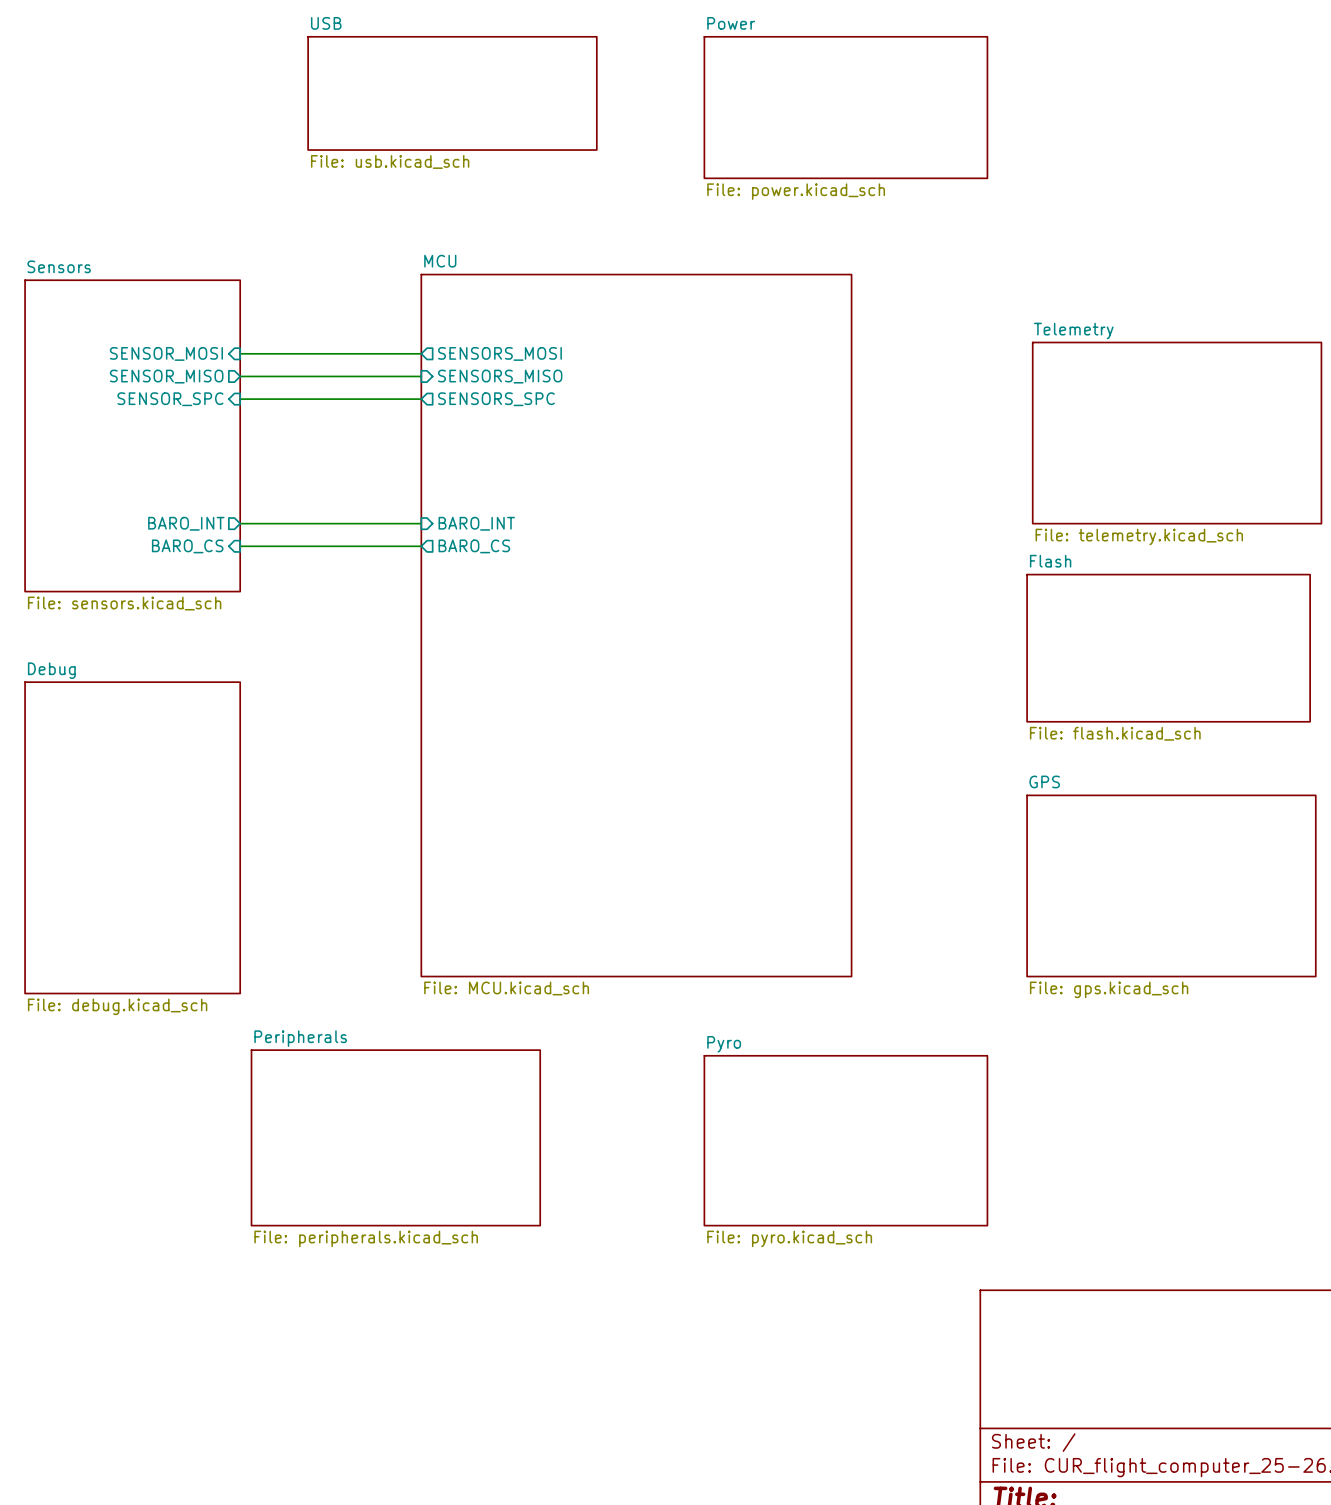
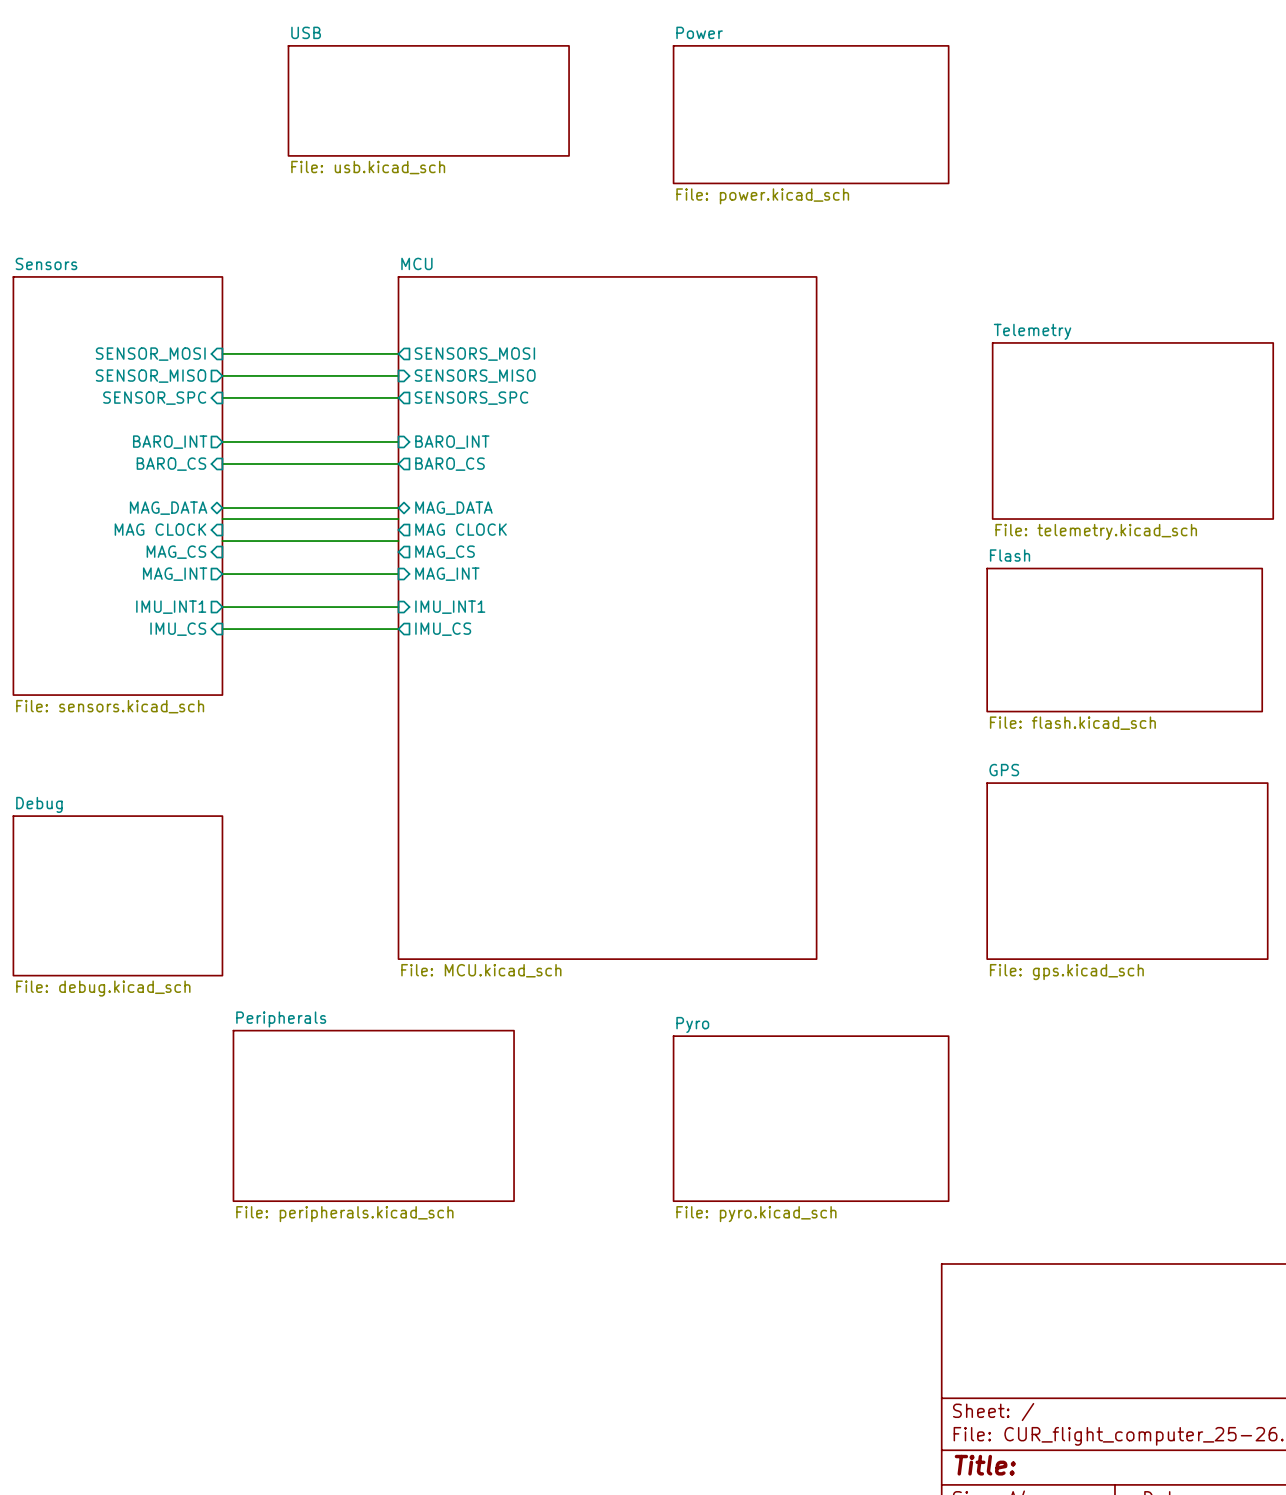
sheet Sensors: File: sensors.kicad_sch (132, 435) -> none
wire: none -> (222, 441) (398, 441)
wire: none -> (222, 463) (398, 463)
sheet Sensors: none -> File: sensors.kicad_sch (117, 486)
sheet pin: none -> MAG_DATA (168, 508)
wire: none -> (222, 508) (398, 508)
sheet pin: none -> MAG_DATA (453, 508)
sheet pin position: BARO_INT (186, 523) -> BARO_INT (170, 442)
sheet pin position: BARO_INT (476, 523) -> BARO_INT (452, 442)
sheet pin: none -> MAG CLOCK (160, 529)
sheet pin: none -> MAG CLOCK (461, 529)
sheet pin position: BARO_CS (187, 546) -> BARO_CS (171, 464)
sheet pin position: BARO_CS (474, 546) -> BARO_CS (450, 464)
sheet pin: none -> MAG_CS (176, 552)
sheet pin: none -> MAG_CS (445, 552)
sheet pin: none -> MAG_INT (175, 574)
wire: none -> (222, 574) (398, 574)
sheet pin: none -> MAG_INT (447, 574)
sheet pin: none -> IMU_INT1 (171, 607)
wire: none -> (222, 607) (398, 607)
sheet pin: none -> IMU_INT1 (450, 607)
sheet pin: none -> IMU_CS (178, 629)
wire: none -> (222, 629) (398, 629)
sheet pin: none -> IMU_CS (443, 629)
sheet Debug: File: debug.kicad_sch (132, 837) -> none
sheet Debug: none -> File: debug.kicad_sch (117, 895)

